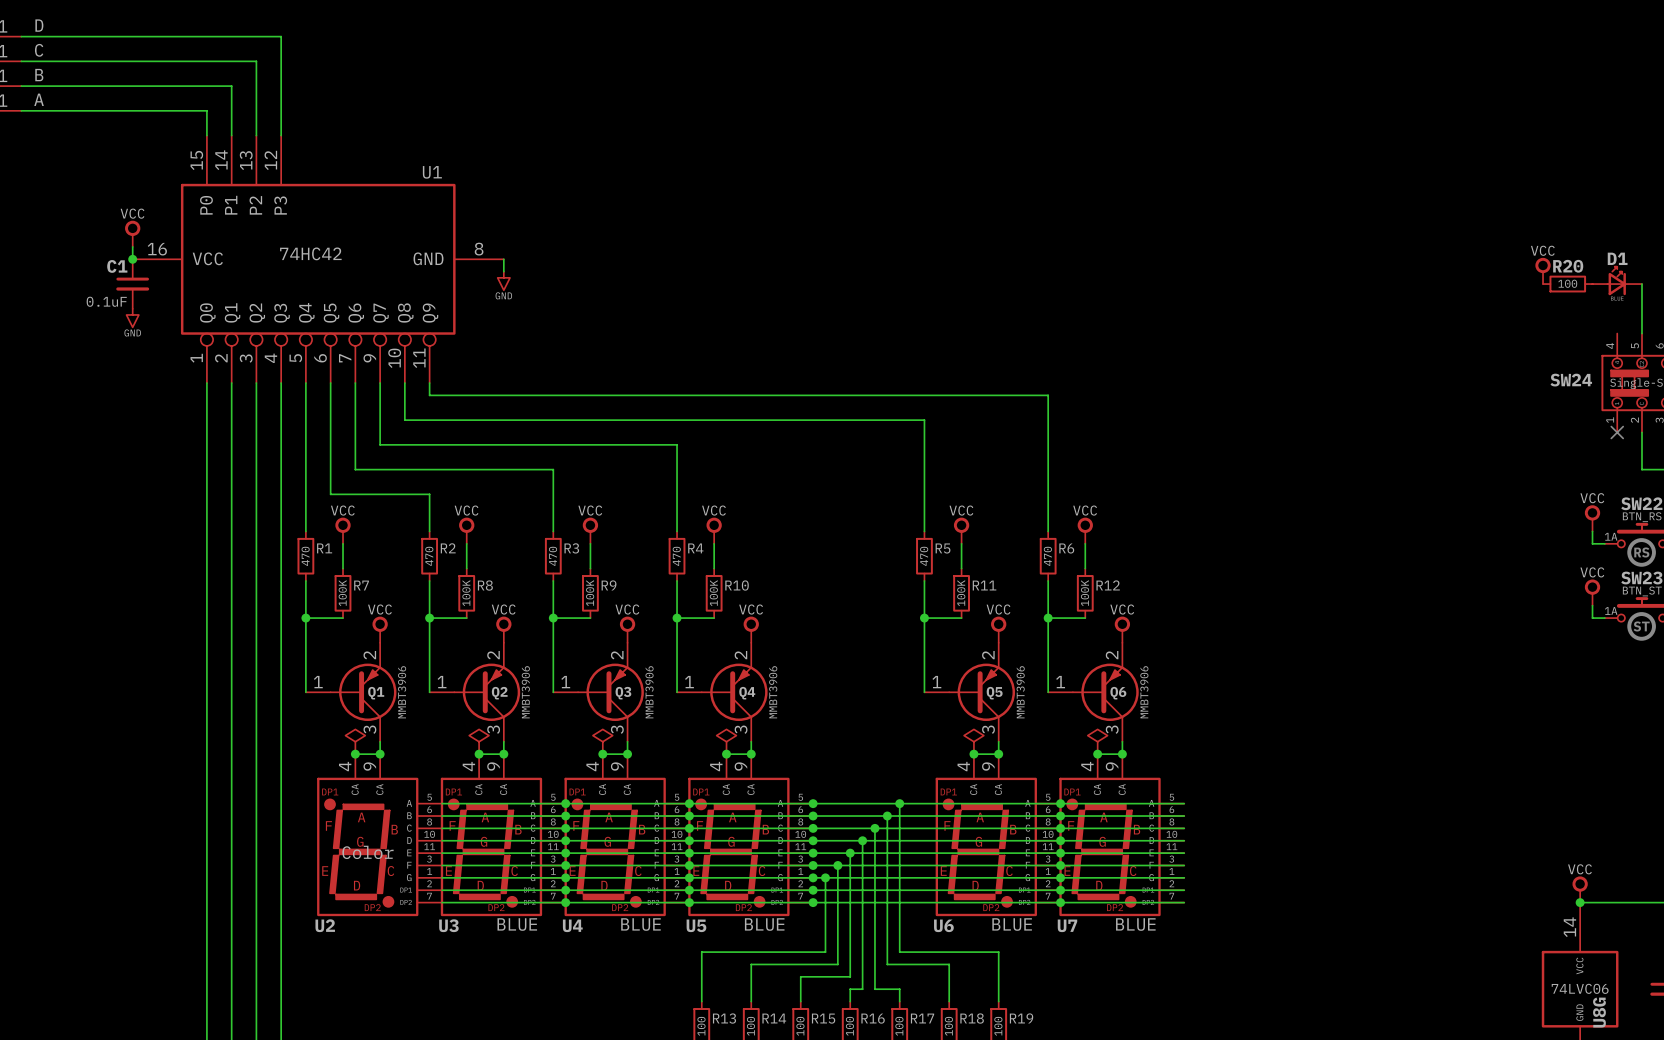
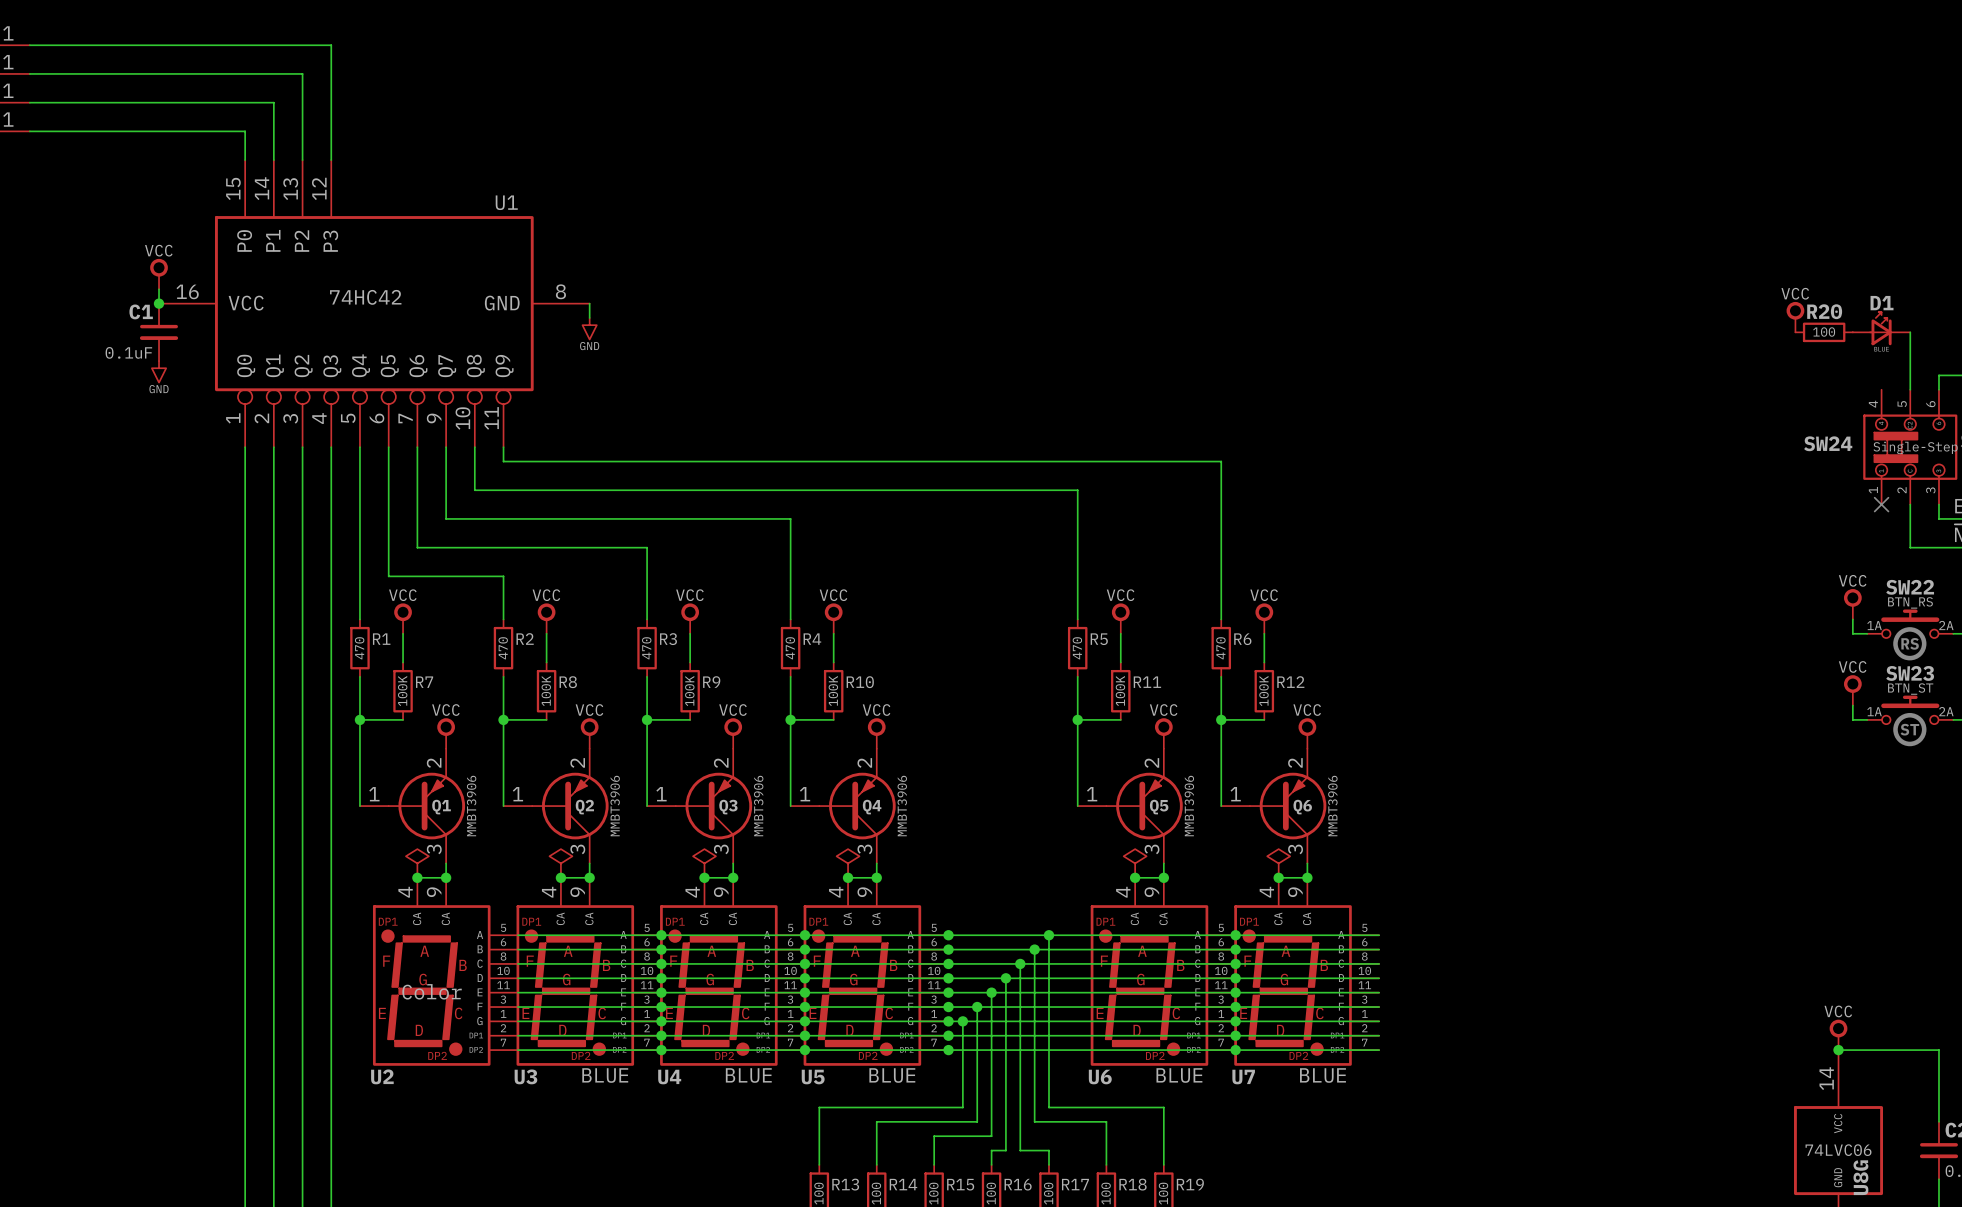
label: D (39, 25) -> none
label: C (39, 50) -> none
label: B (39, 75) -> none
label: A (39, 99) -> none

